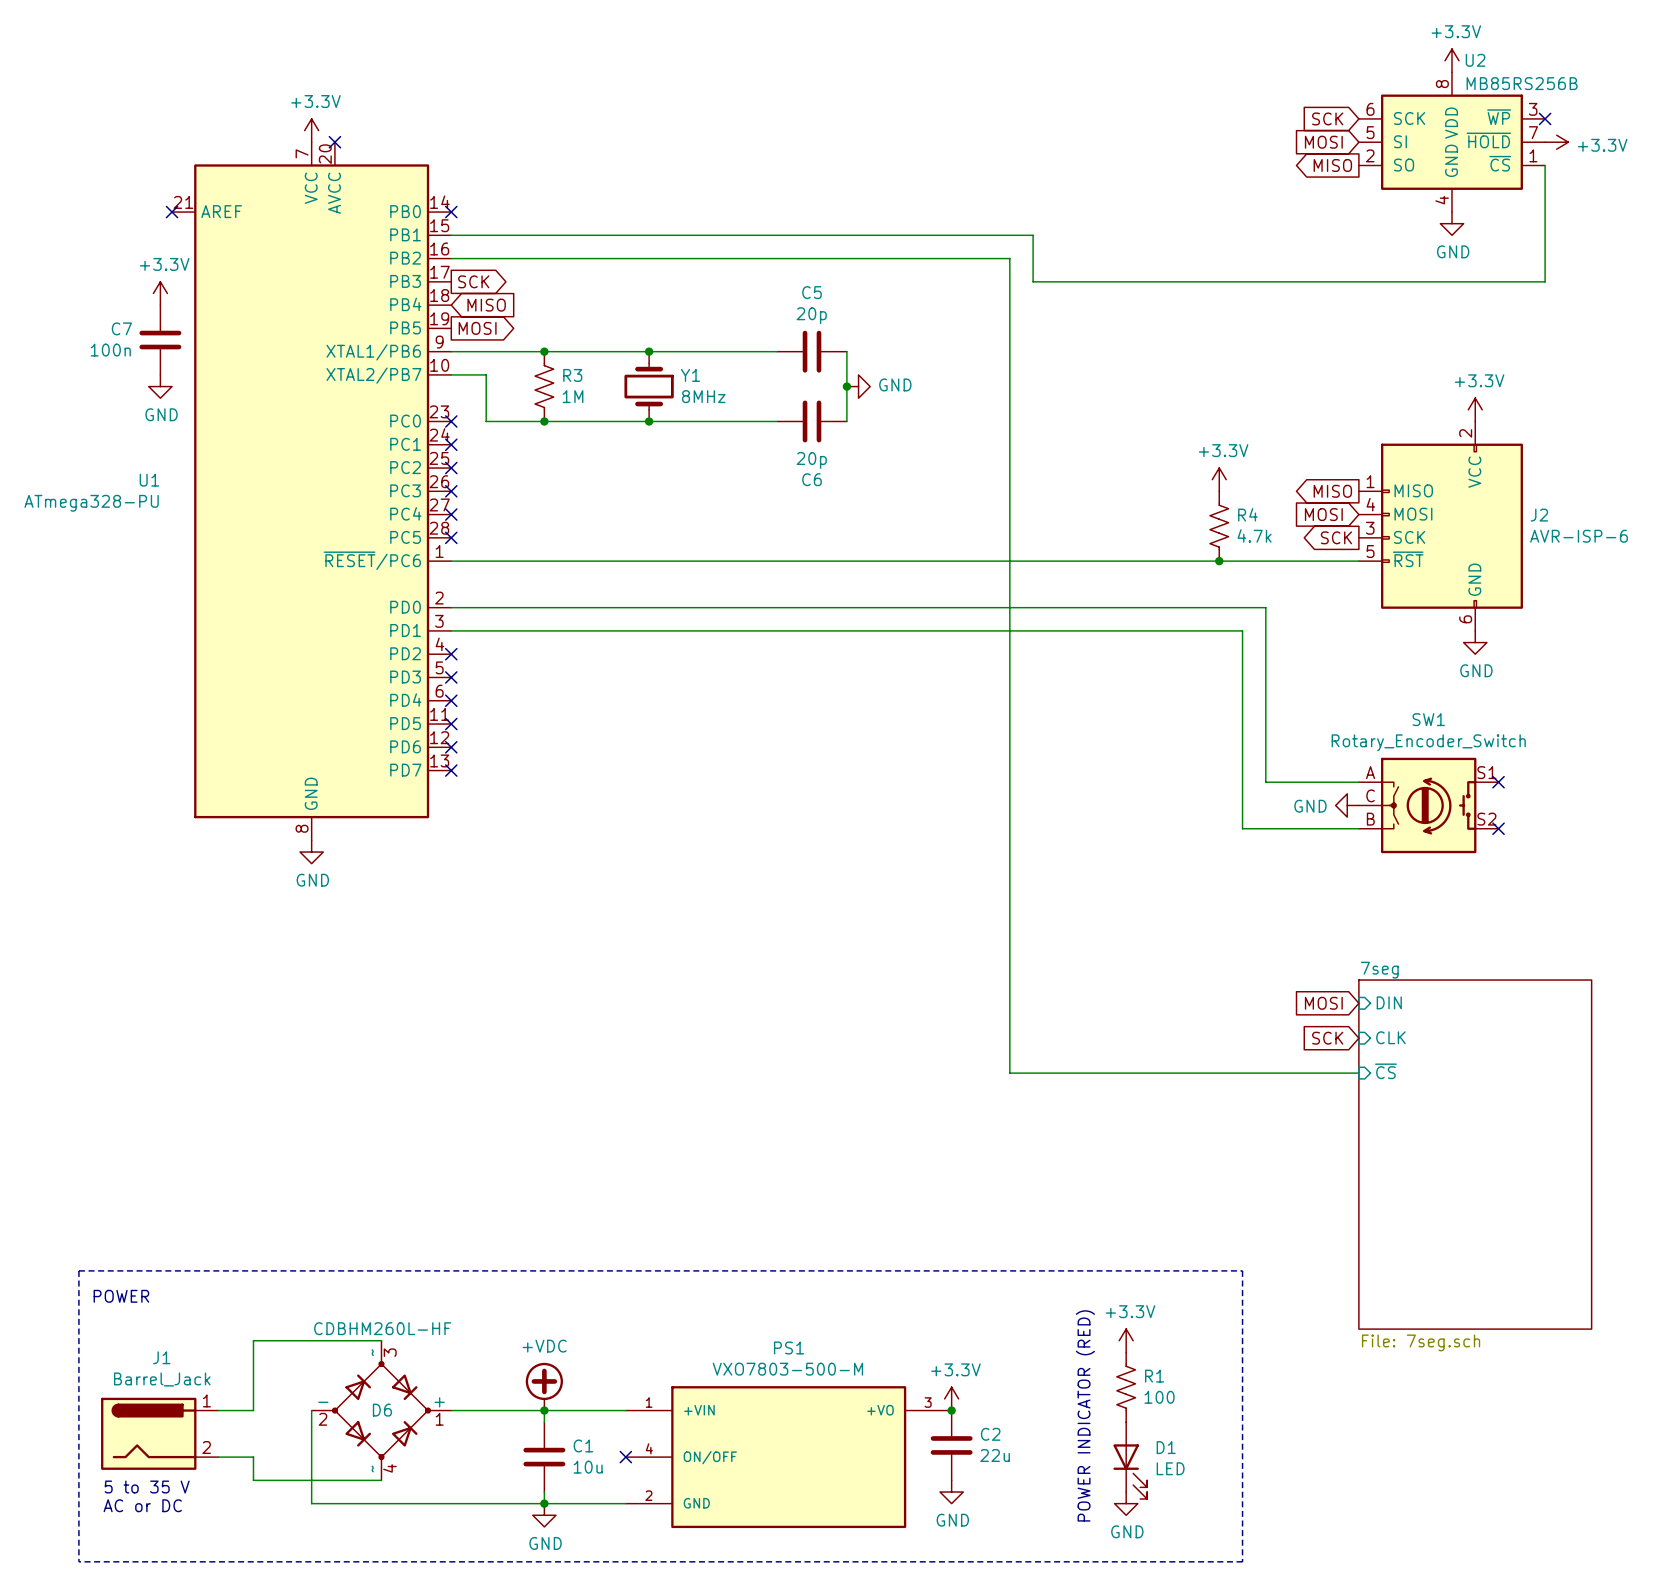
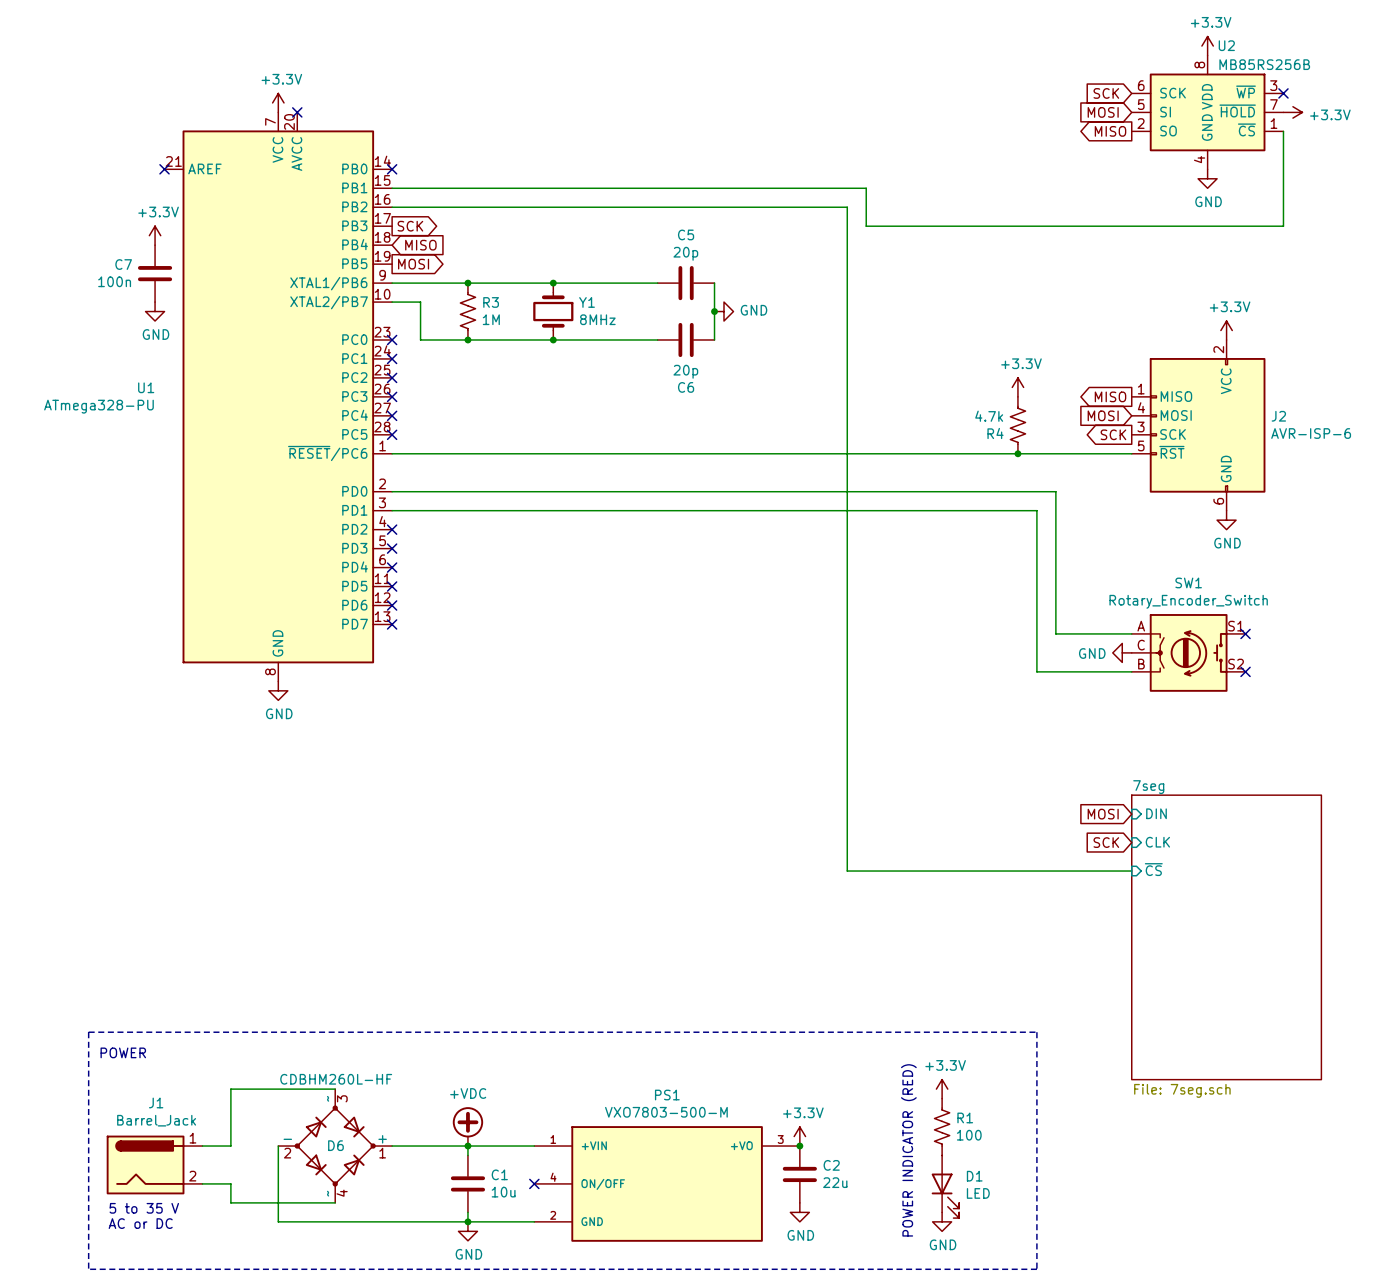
R4 name position: R4 (1247, 514) -> R4 (995, 433)
R4 value position: 4.7k (1254, 535) -> 4.7k (989, 416)

